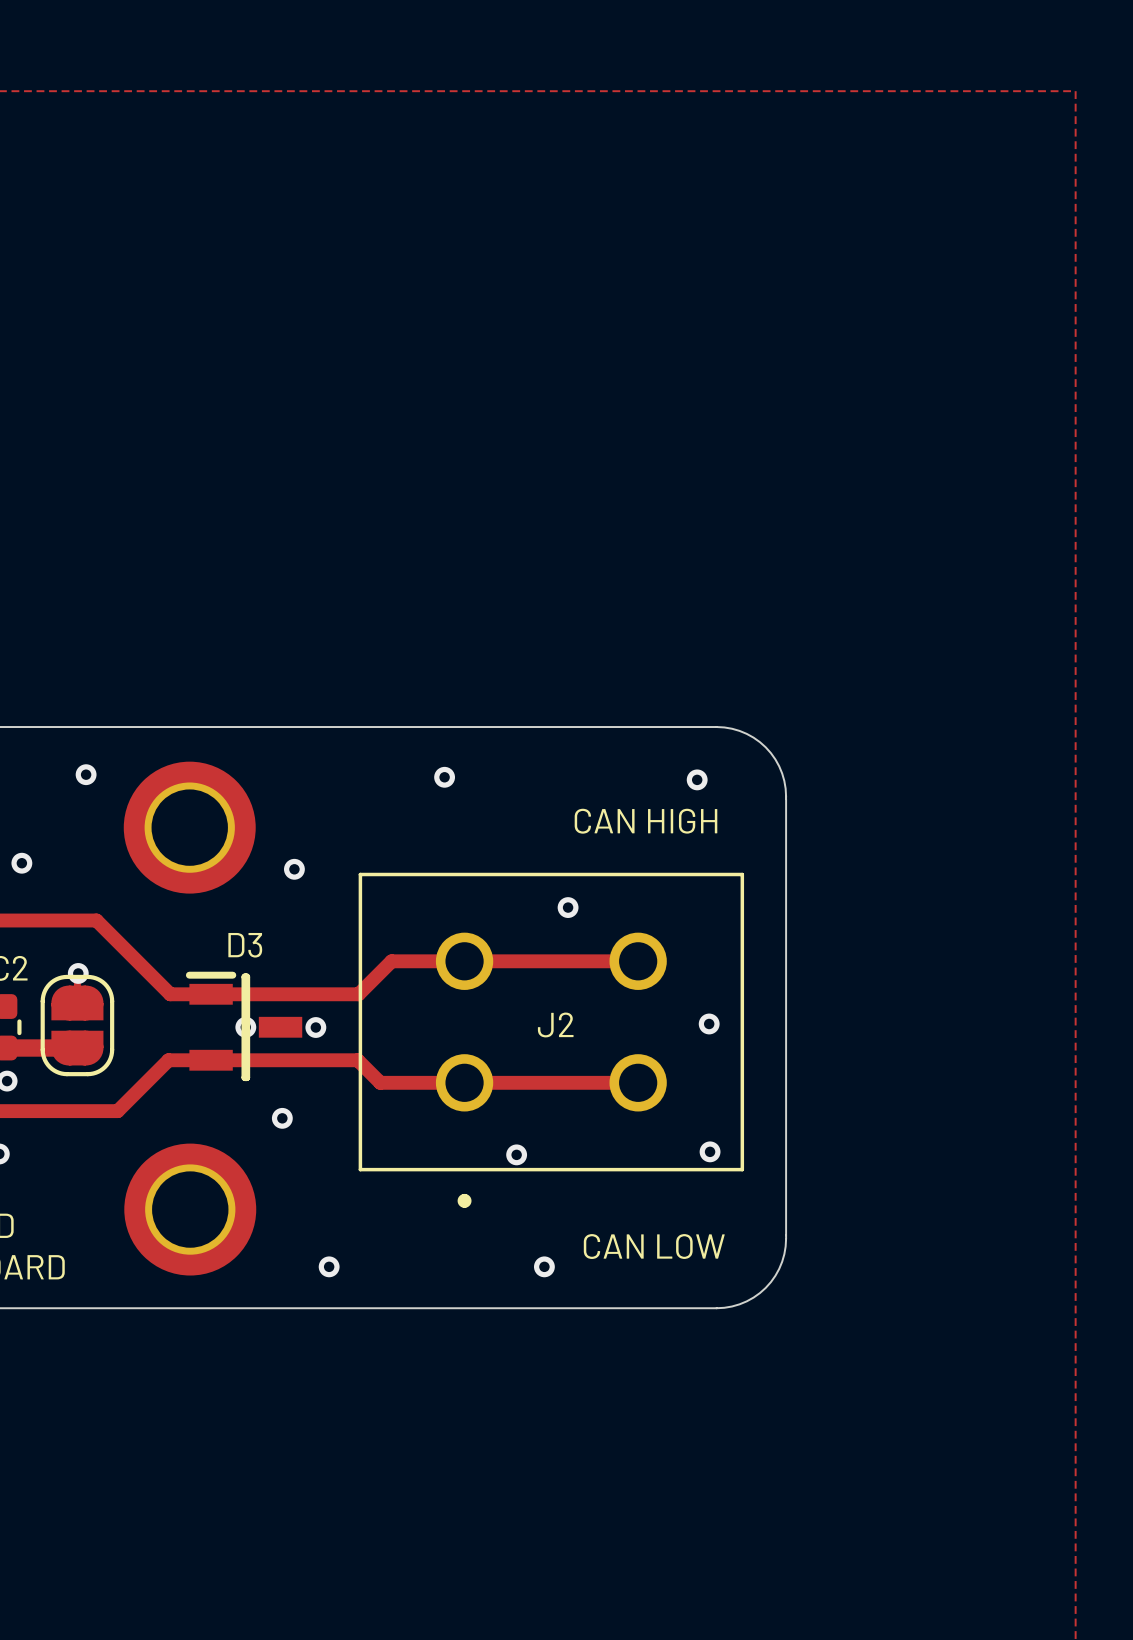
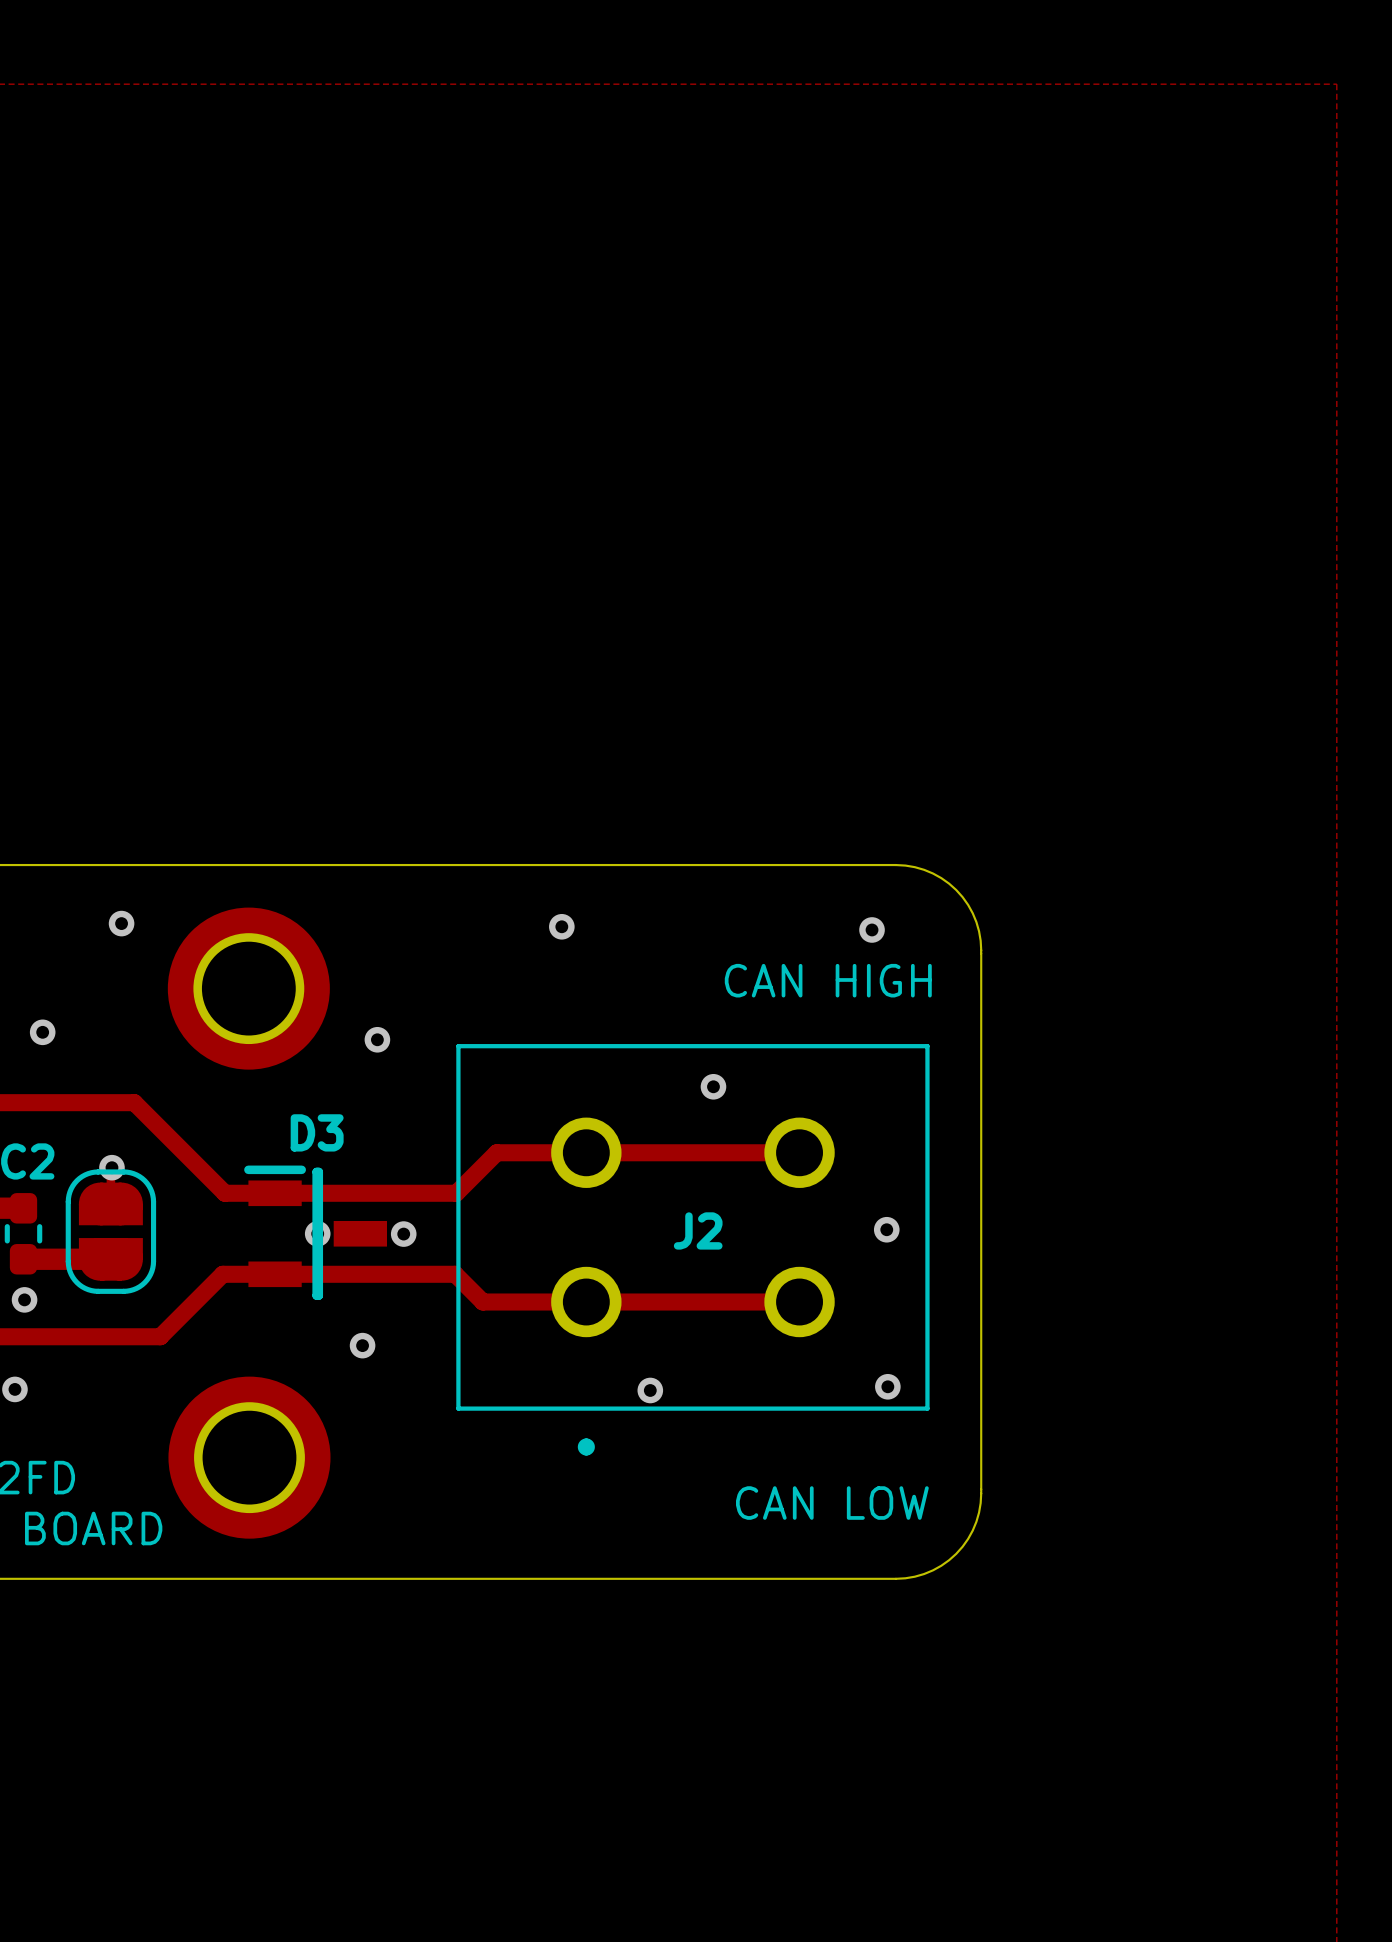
via: (329, 1266) -> none
via: (544, 1266) -> none

